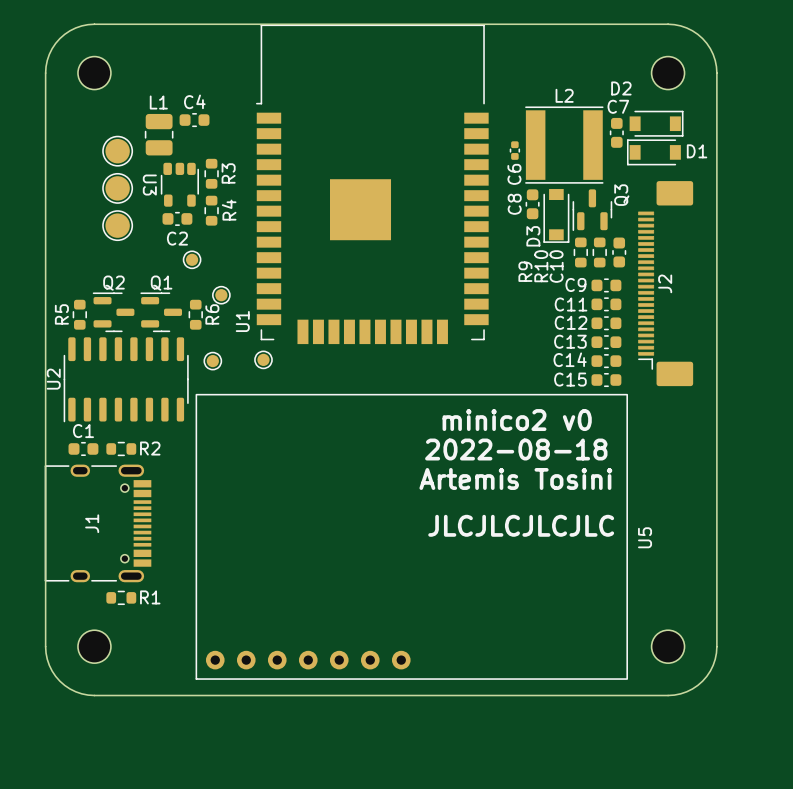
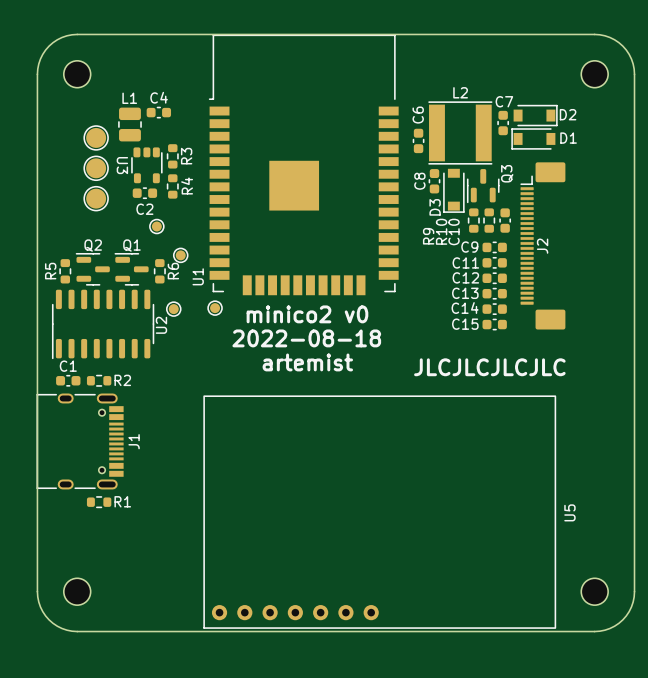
board edge: (668, 24) (686, 27) (702, 38) (713, 54) (716, 73) (716, 646) (713, 665) (702, 681) (686, 691) (668, 695) (94, 695) (75, 691) (59, 681) (49, 665) (45, 646) -> (544, 34) (594, 34) (609, 37) (626, 50) (634, 69) (634, 591) (631, 606) (622, 619) (609, 628) (594, 631) (72, 631) (53, 623) (40, 606) (37, 591) (37, 541)
part position: (668, 73) -> (594, 74)
D2 name position: D2 (621, 88) -> D2 (568, 114)
C6 footprint: [509, 141, 521, 160] -> [412, 128, 425, 154]
C6 name position: C6 (514, 174) -> C6 (418, 115)
J2 footprint: [638, 181, 694, 387] -> [520, 162, 566, 330]
U2 name position: U2 (53, 379) -> U2 (161, 325)
text position: minico2 v0 (517, 420) -> minico2 v0 (307, 314)
text: none -> artemist (307, 362)
text position: 2022-08-18 (516, 449) -> 2022-08-18 (306, 338)
text: Artemis Tosini (515, 478) -> none
J1 name position: J1 (92, 523) -> J1 (134, 441)
text position: JLCJLCJLCJLC (521, 525) -> JLCJLCJLCJLC (489, 367)
U5 position: (411, 536) -> (379, 512)
part position: (94, 646) -> (77, 591)
part position: (668, 646) -> (594, 591)

